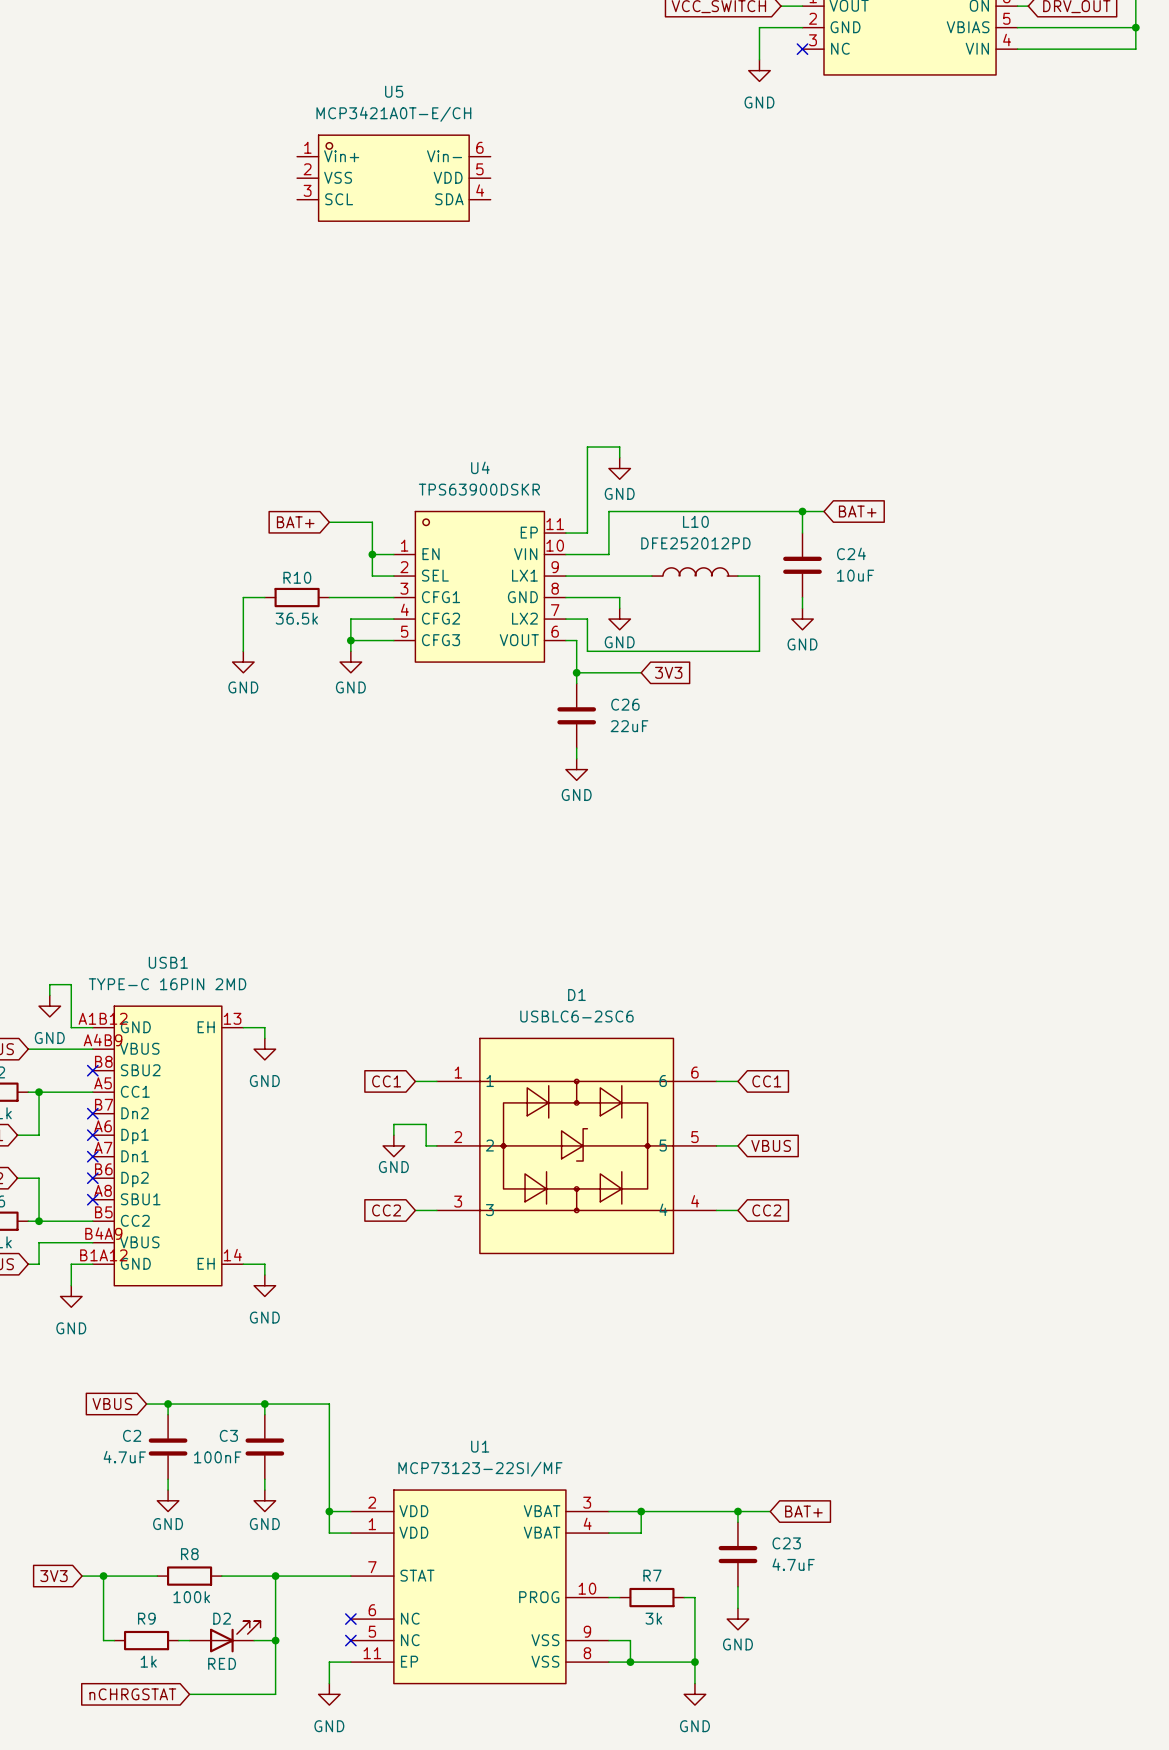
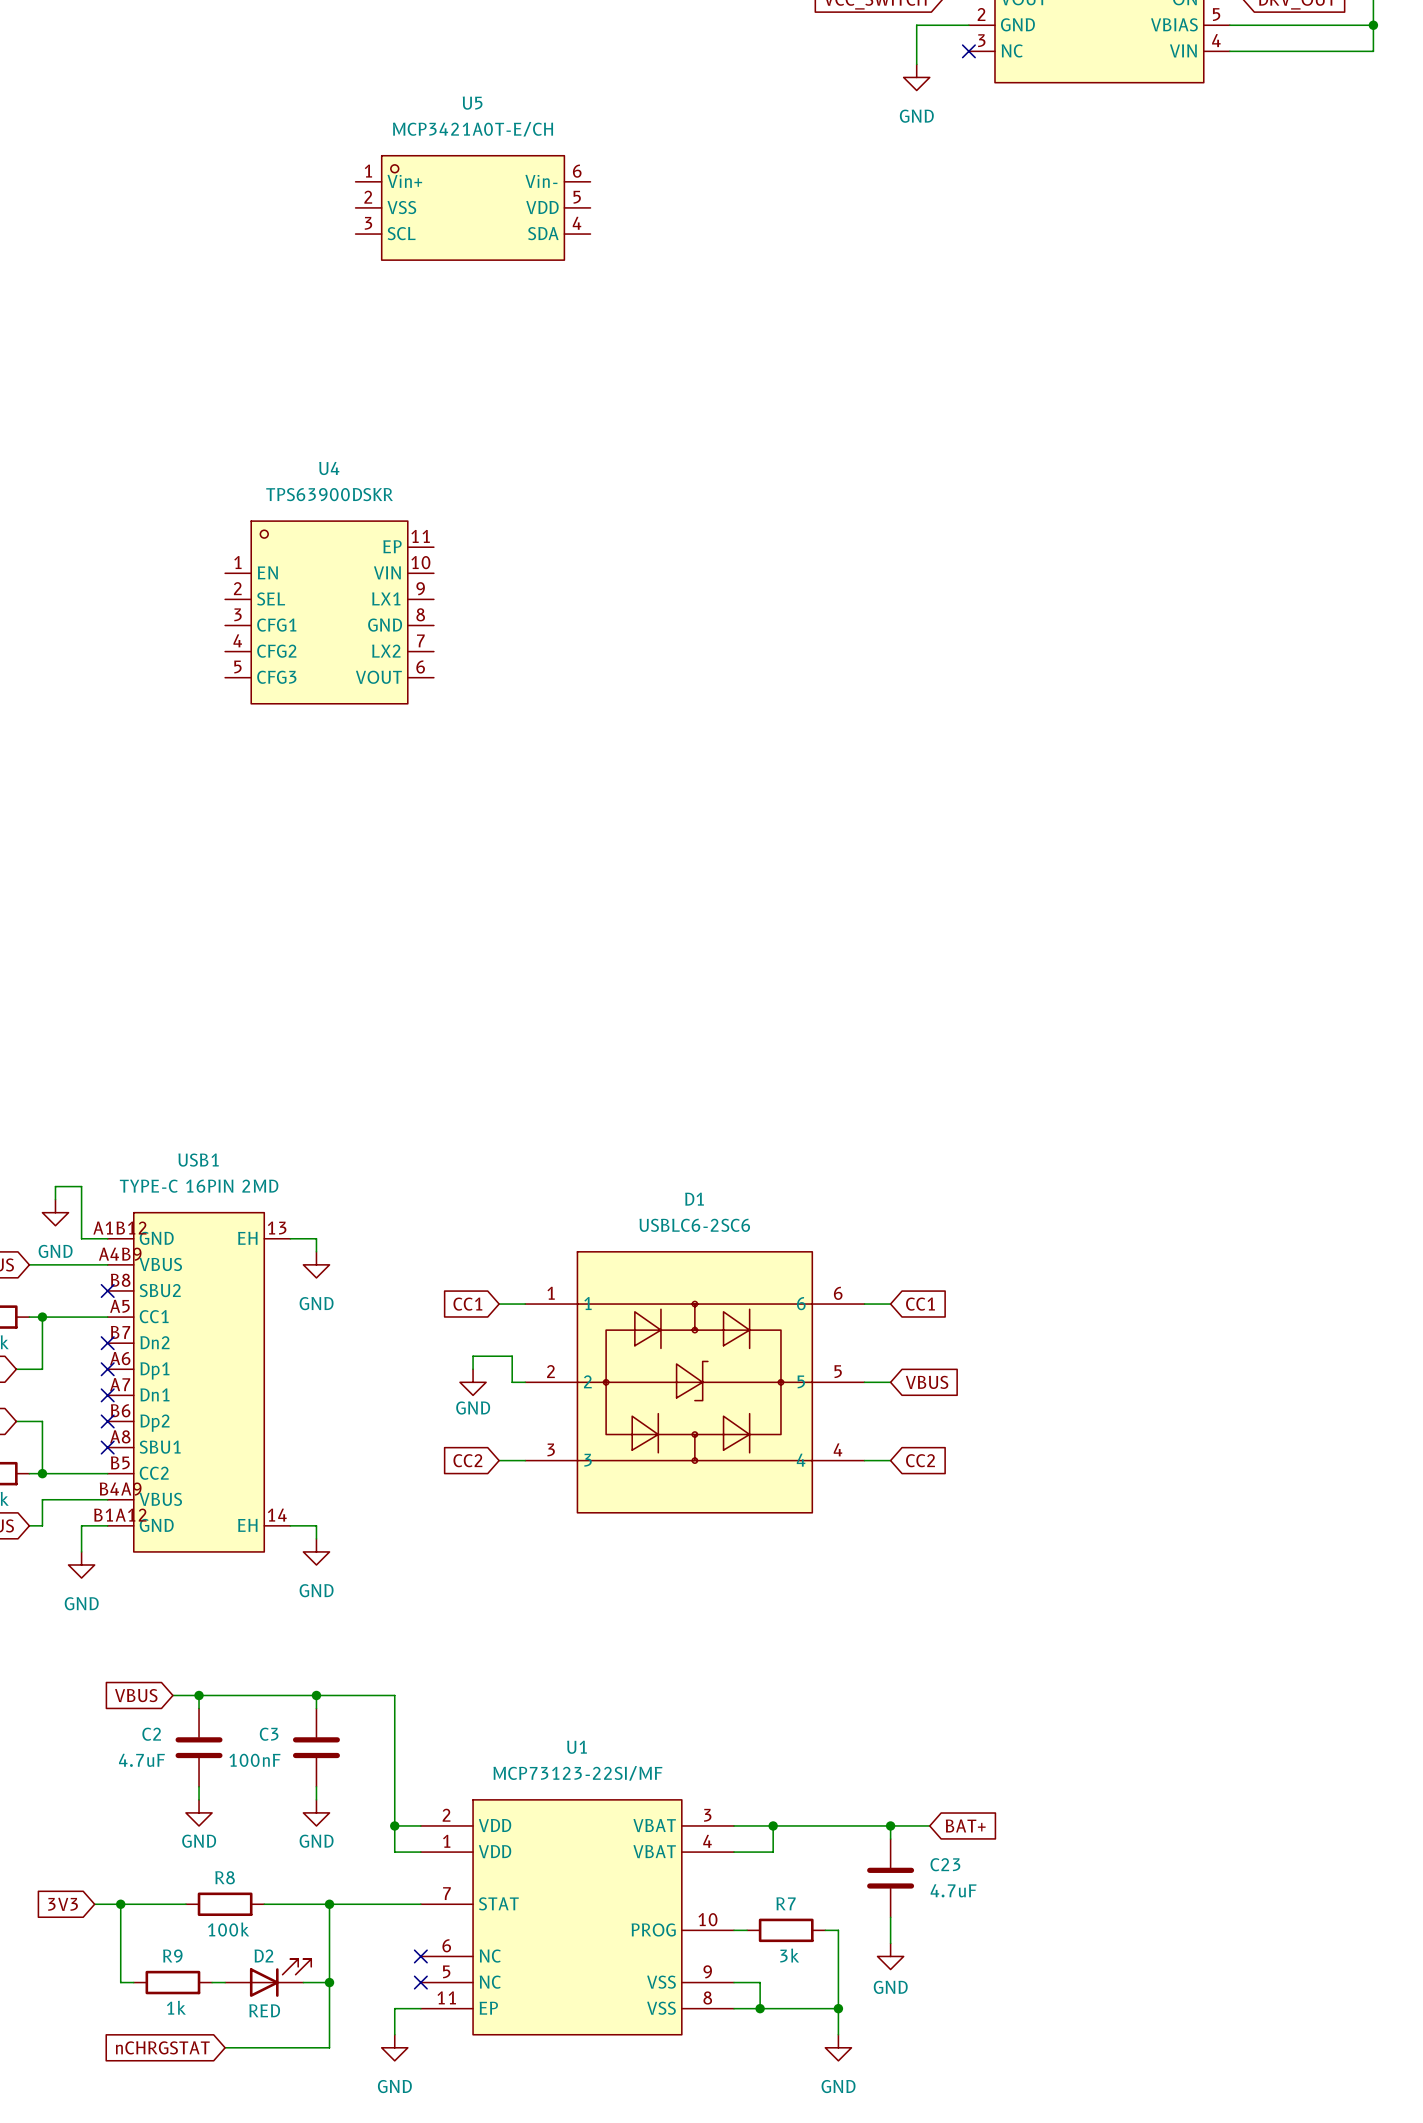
wire: (619, 457) (619, 447) (587, 447) (587, 533) (565, 533) -> none
power symbol: GND (619, 468) -> none
wire: (802, 511) (802, 533) -> none
junction: (802, 511) -> none
wire: (823, 511) (608, 511) (608, 554) (565, 554) -> none
global label: BAT+ (857, 511) -> none
global label: BAT+ (295, 522) -> none
wire: (329, 522) (372, 522) (372, 576) (393, 576) -> none
wire: (372, 554) (393, 554) -> none
junction: (372, 554) -> none
C24: 10uF (802, 565) -> none
L10: DFE252012PD (694, 571) -> none
wire: (565, 576) (651, 576) -> none
wire: (737, 576) (759, 576) (759, 651) (587, 651) (587, 619) (565, 619) -> none
U4 position: (479, 586) -> (329, 612)
wire: (264, 597) (243, 597) (243, 651) -> none
R10: 36.5k (297, 597) -> none
wire: (329, 597) (393, 597) -> none
wire: (565, 597) (619, 597) (619, 608) -> none
wire: (802, 597) (802, 608) -> none
wire: (393, 619) (350, 619) (350, 651) -> none
power symbol: GND (619, 619) -> none
power symbol: GND (802, 619) -> none
wire: (350, 640) (393, 640) -> none
junction: (350, 640) -> none
wire: (565, 640) (576, 640) (576, 683) -> none
power symbol: GND (243, 662) -> none
power symbol: GND (350, 662) -> none
wire: (576, 672) (641, 672) -> none
junction: (576, 672) -> none
global label: 3V3 (668, 672) -> none
C26: 22uF (576, 715) -> none
wire: (576, 748) (576, 758) -> none
power symbol: GND (576, 769) -> none

